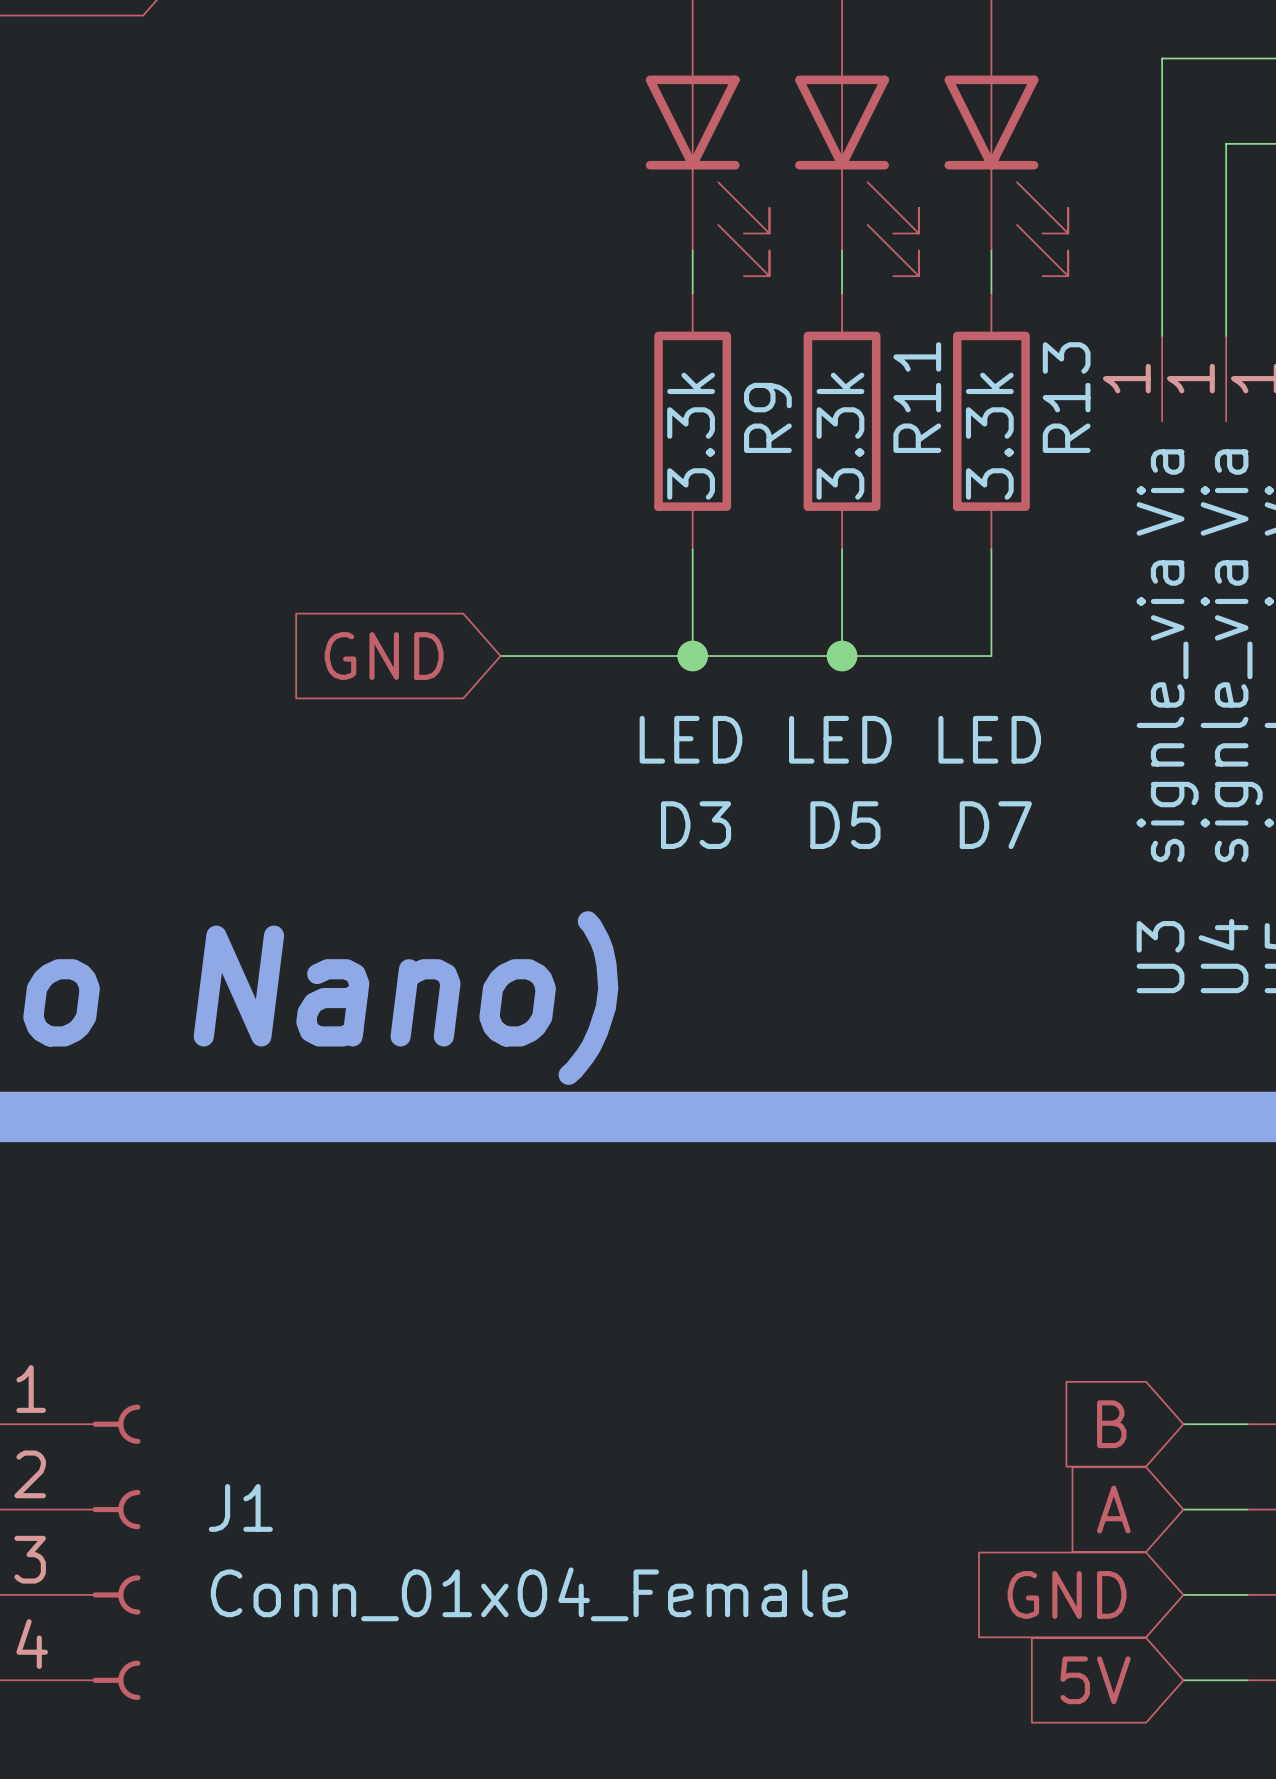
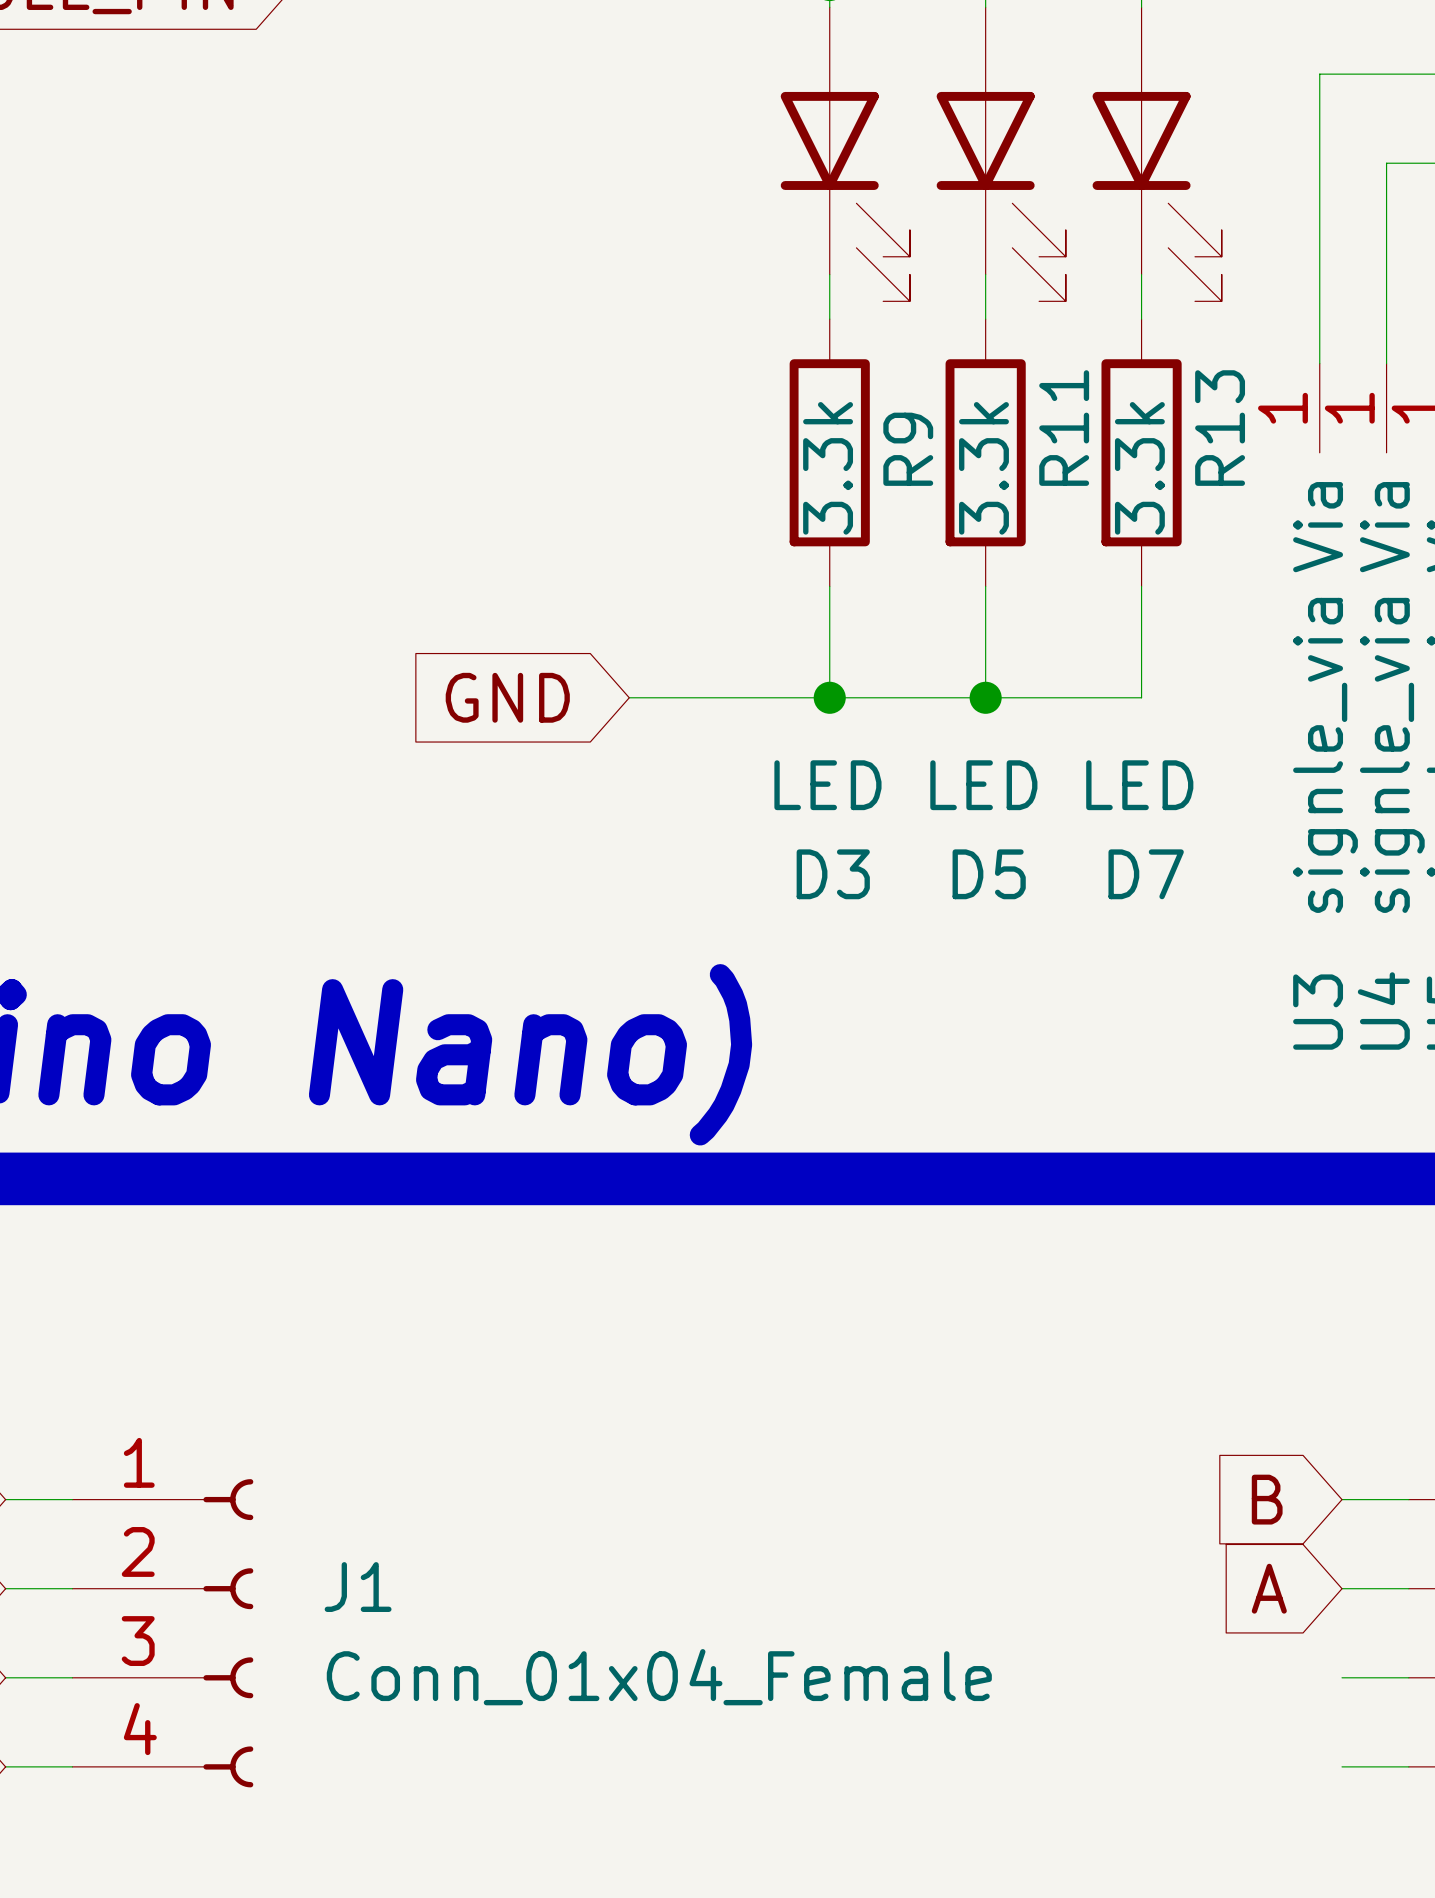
global label: GND (1067, 1594) -> none
global label: 5V (1095, 1680) -> none

